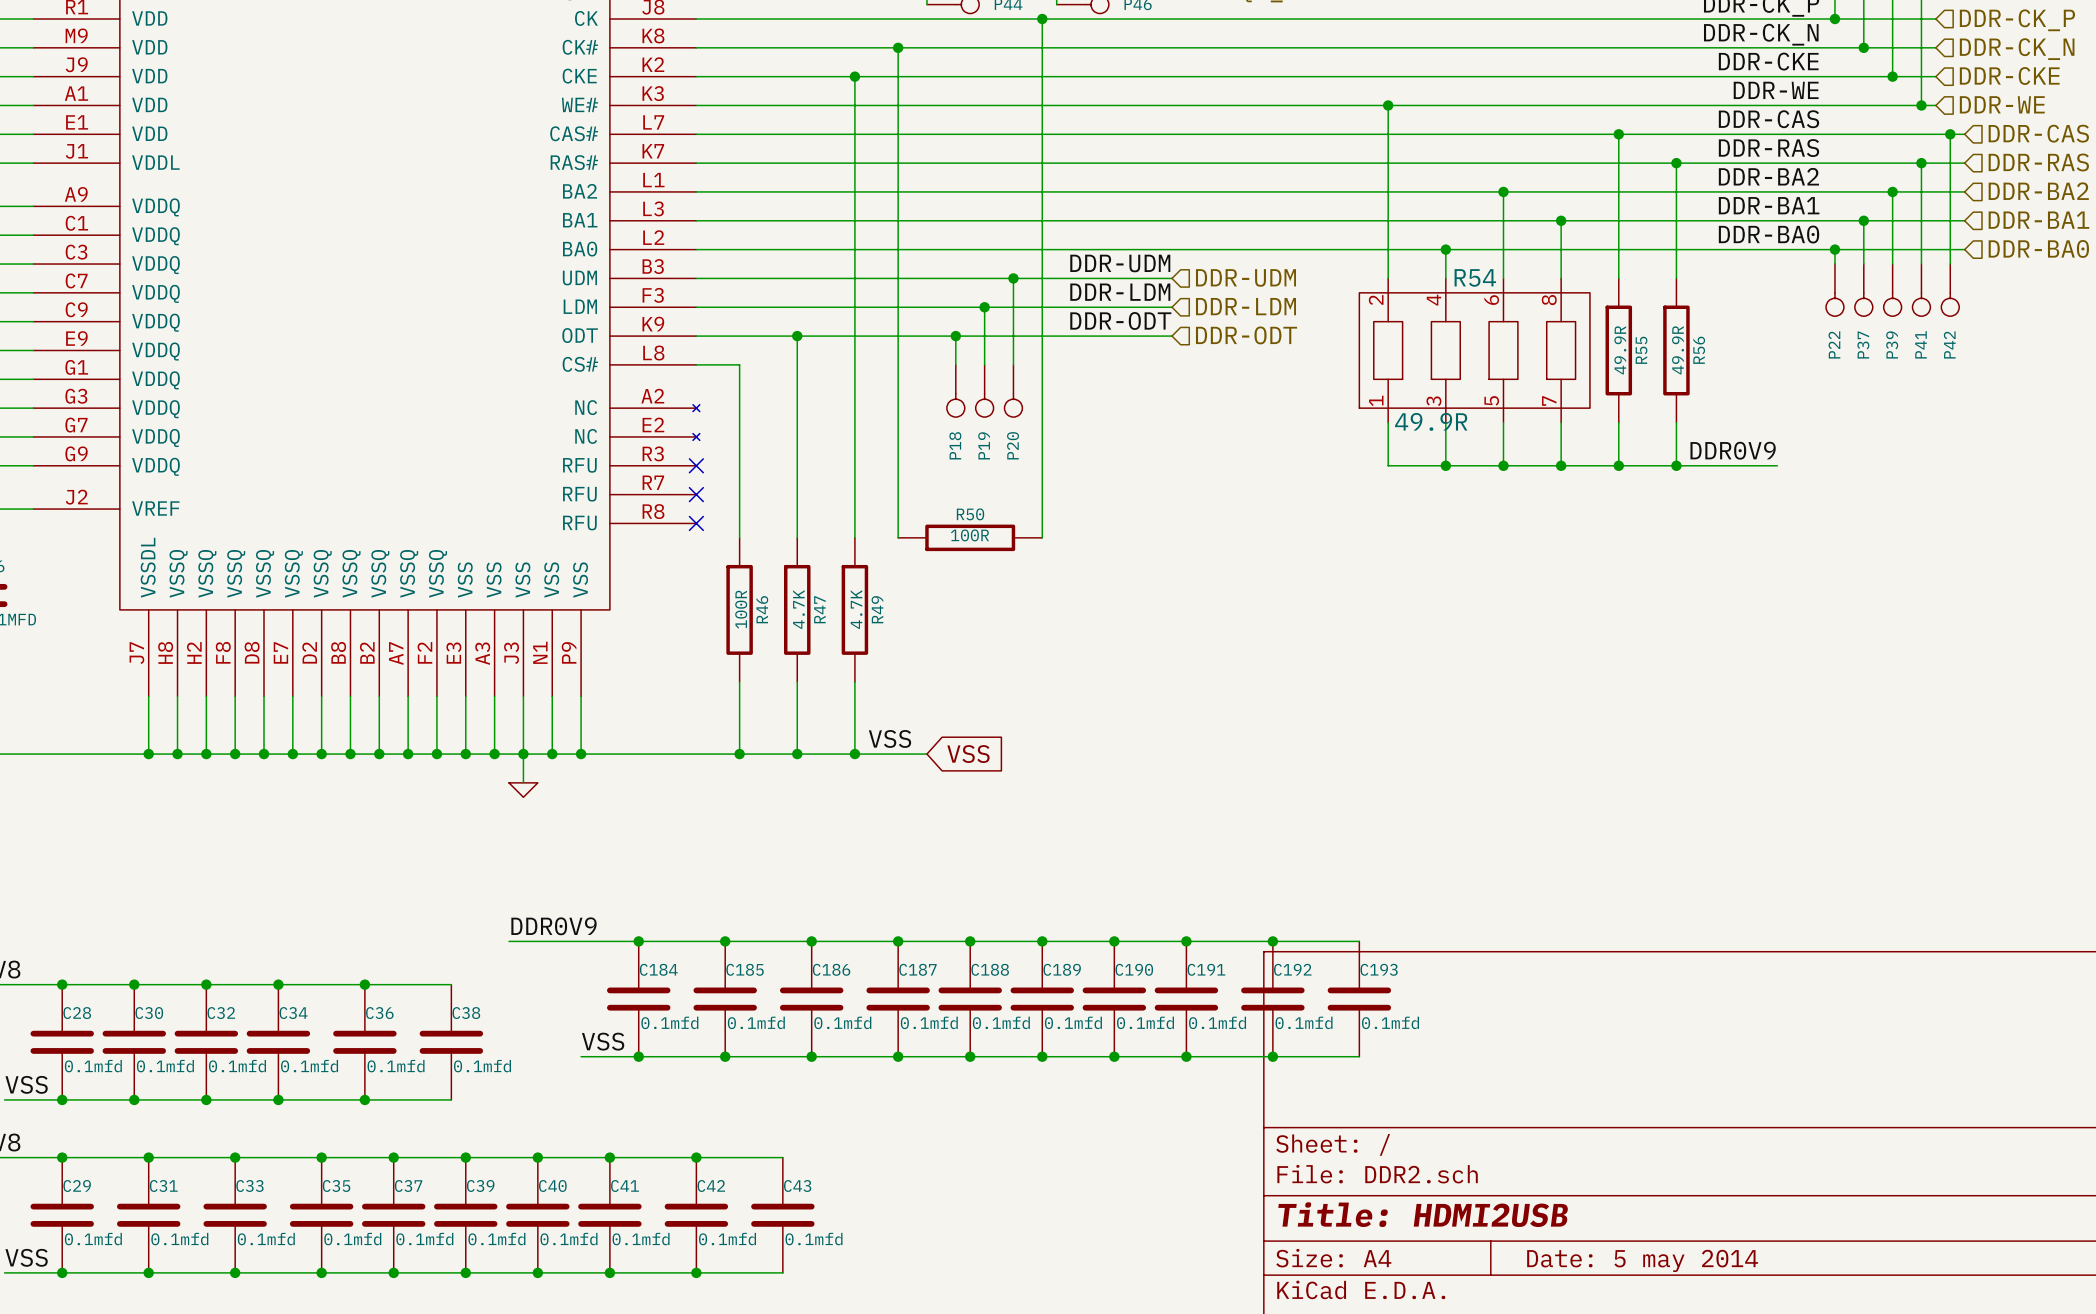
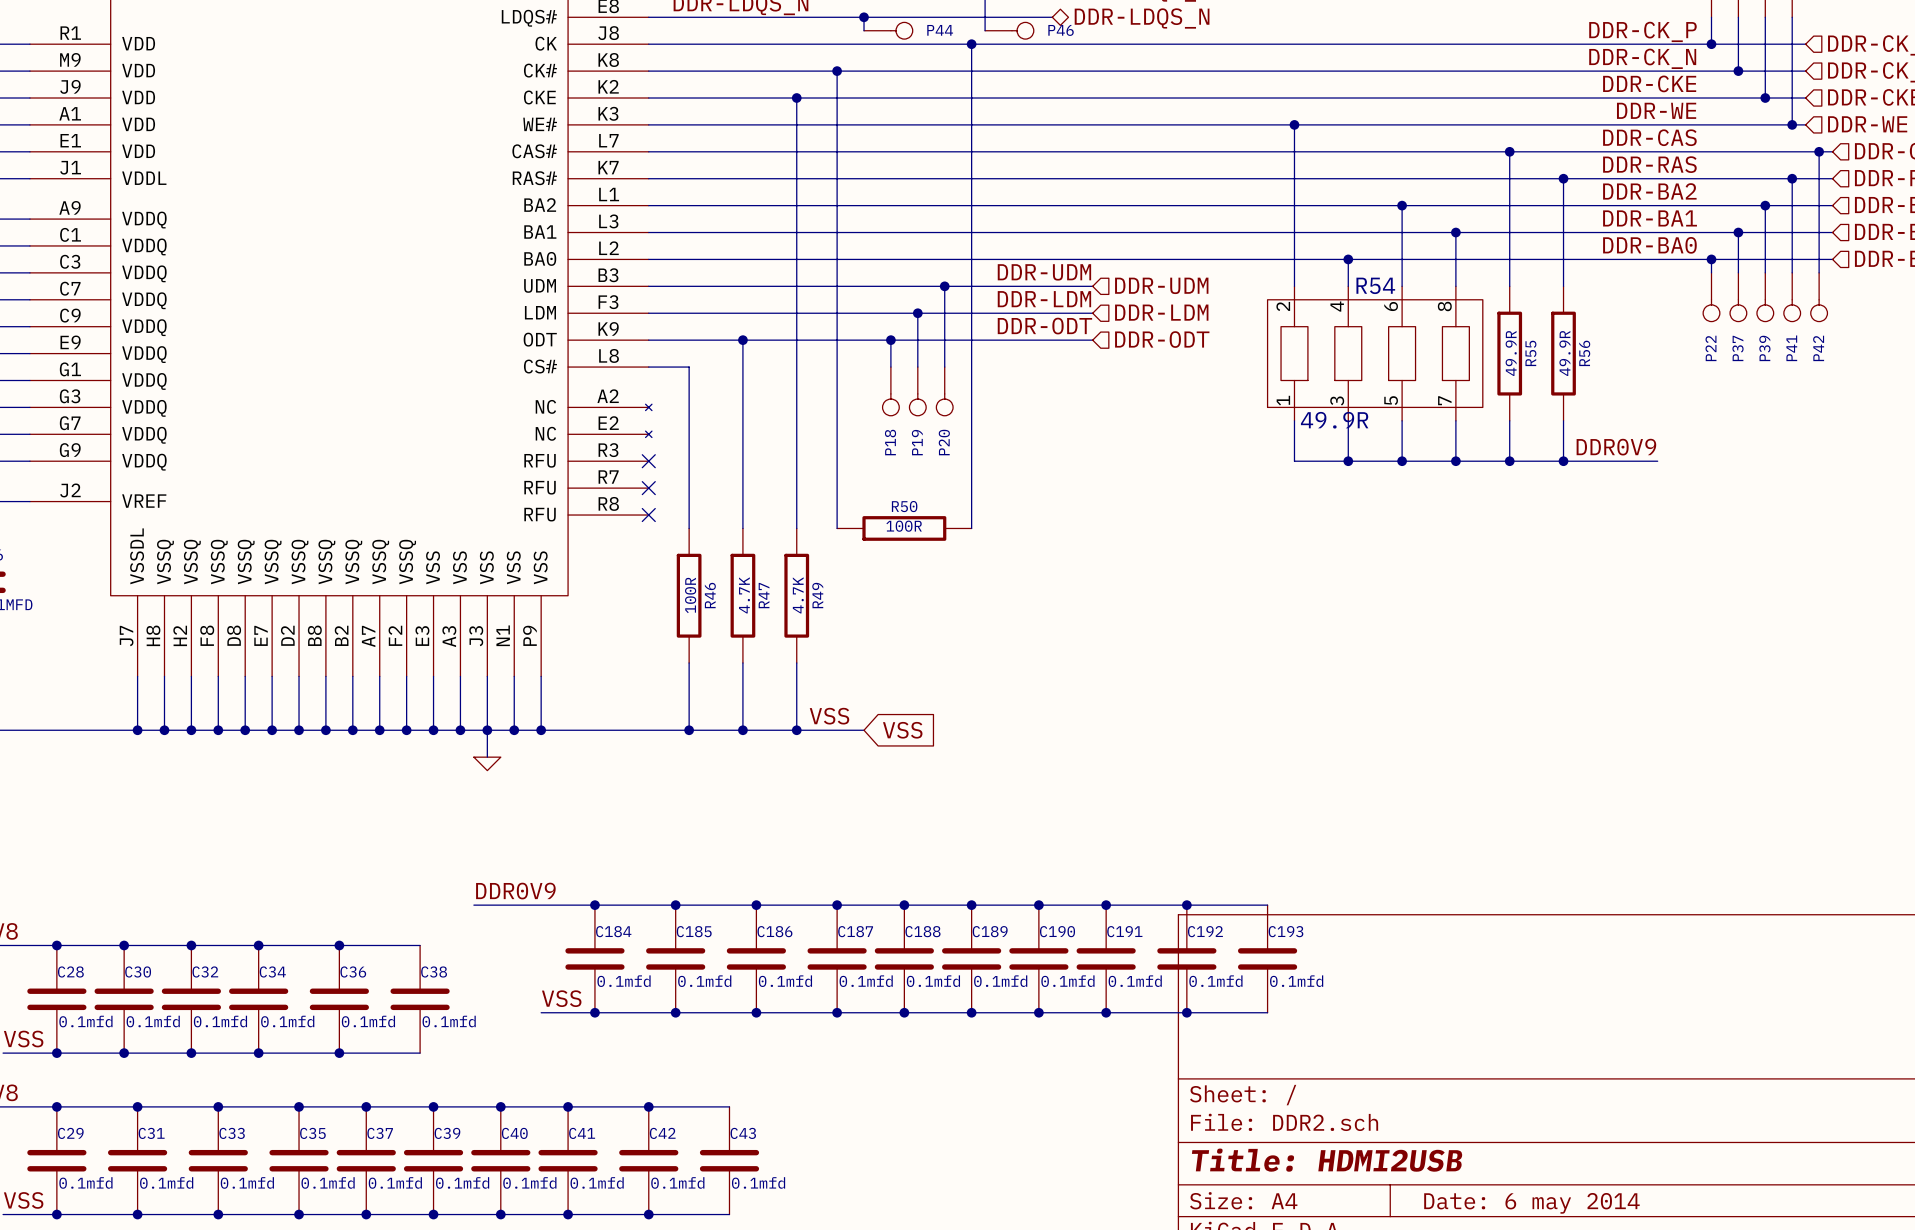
title block: Date: 5 may 2014 (1642, 1260) -> Date: 6 may 2014 (1531, 1203)

